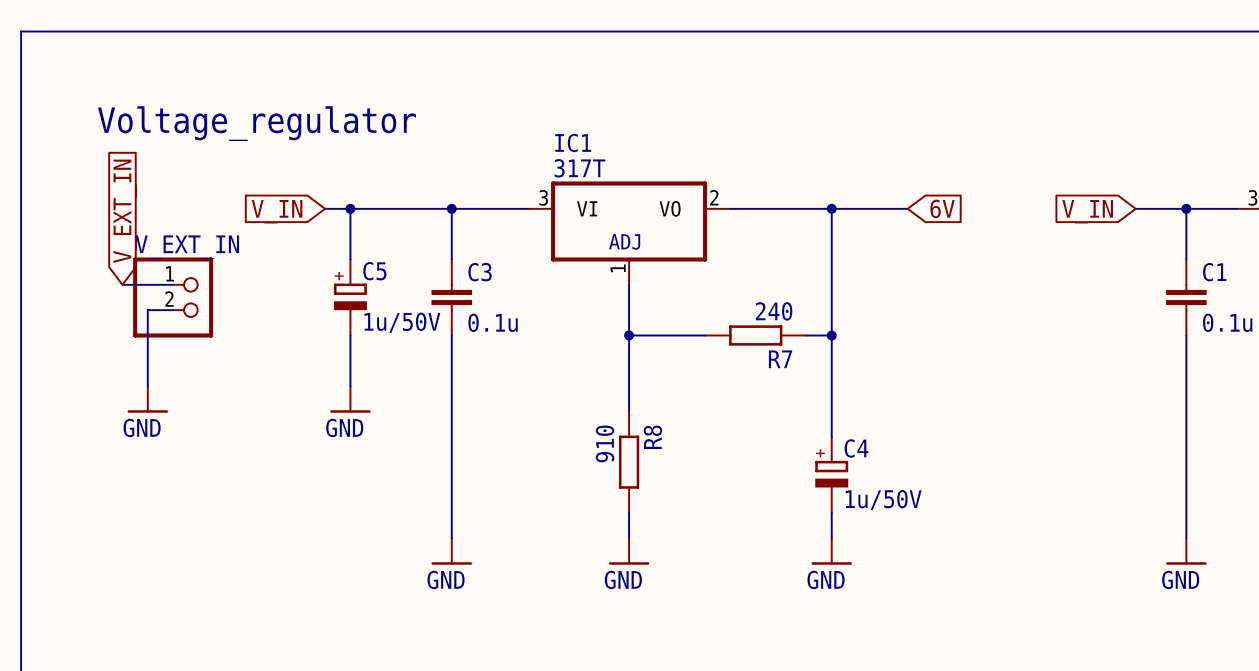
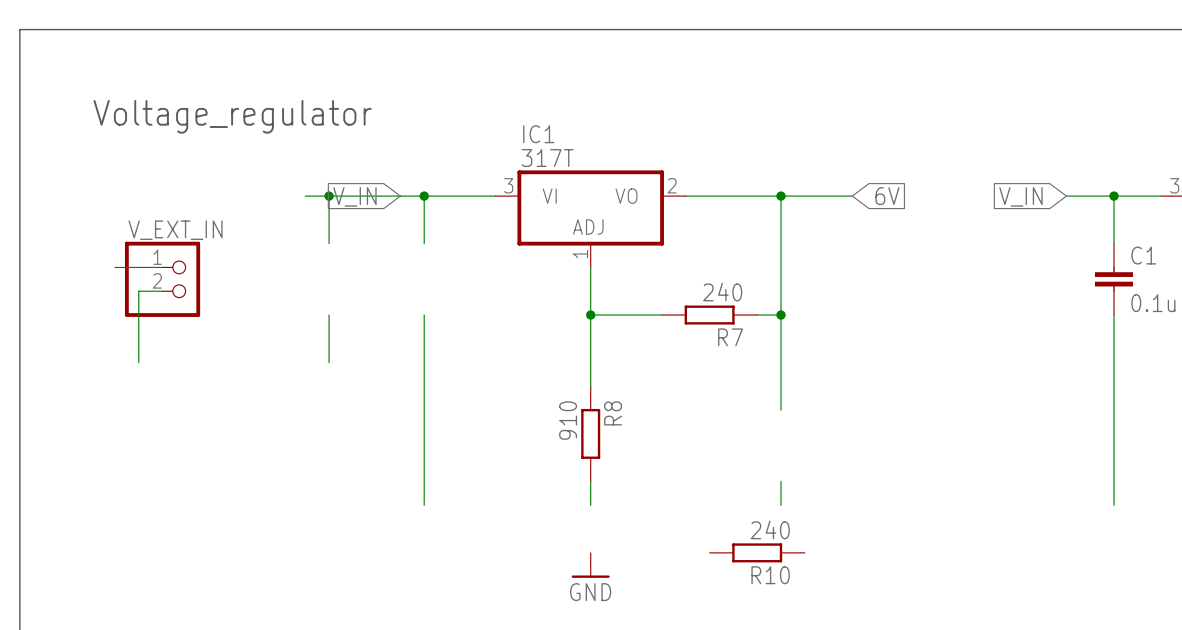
global label: V_EXT_IN (125, 211) -> none
global label position: V_IN (277, 211) -> V_IN (354, 196)
C5: 1u/50V (350, 297) -> none
C3: 0.1u (451, 297) -> none
power symbol: GND (147, 399) -> none
power symbol: GND (350, 399) -> none
C4: 1u/50V (831, 474) -> none
power symbol: GND (451, 551) -> none
power symbol position: GND (629, 551) -> GND (590, 565)
power symbol: GND (831, 551) -> none
power symbol: GND (1186, 551) -> none
R10: none -> 240 (757, 552)

